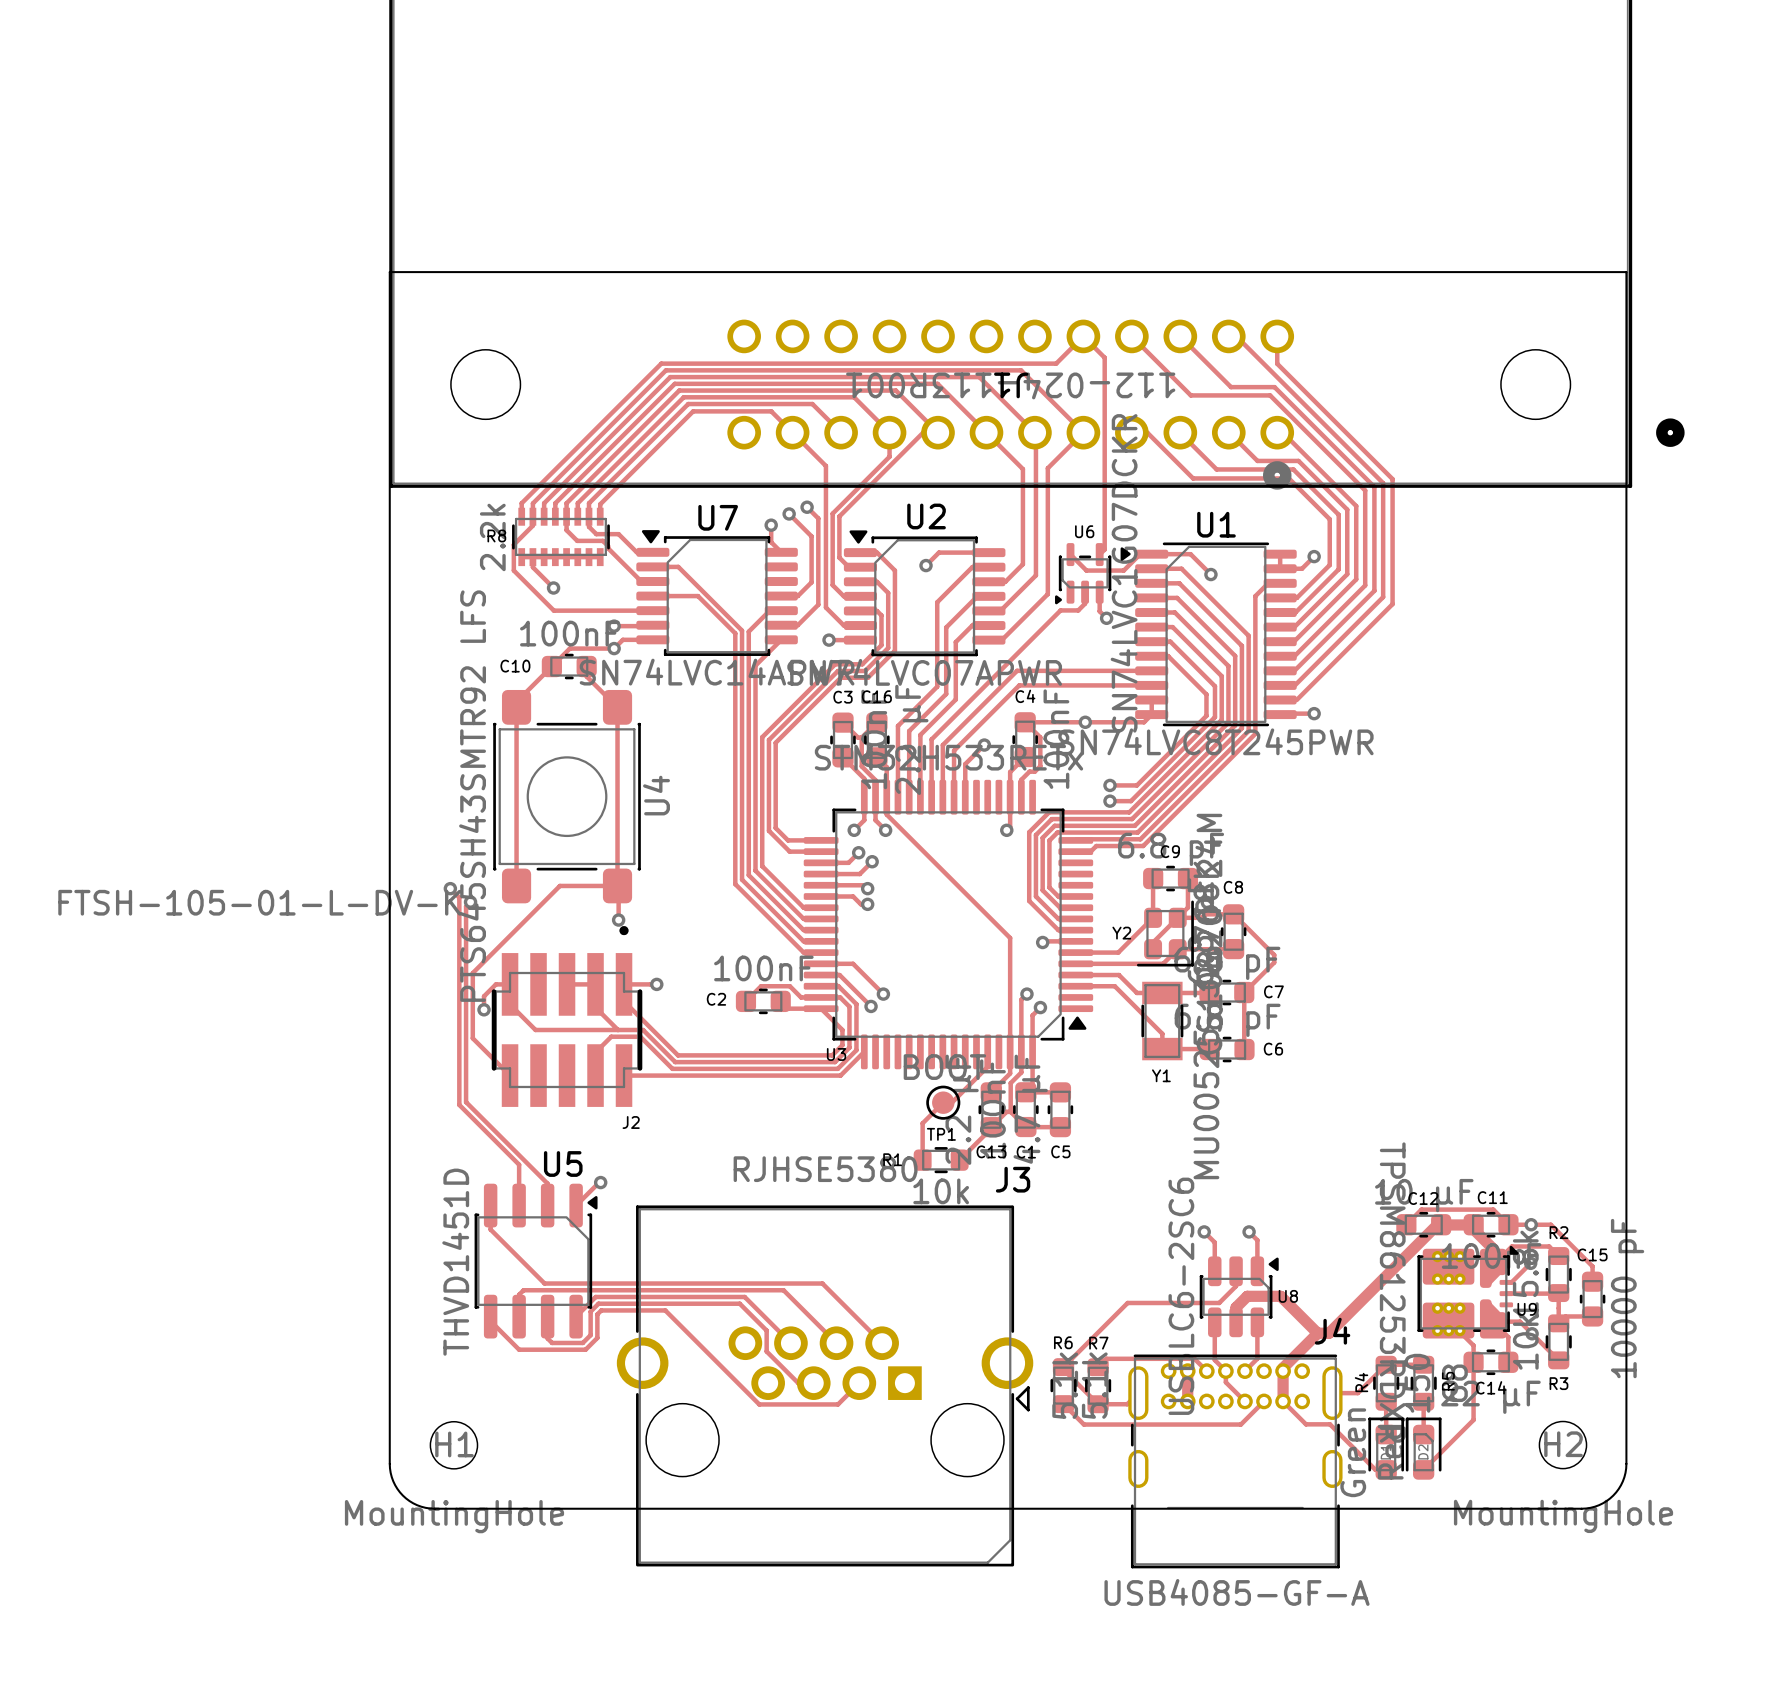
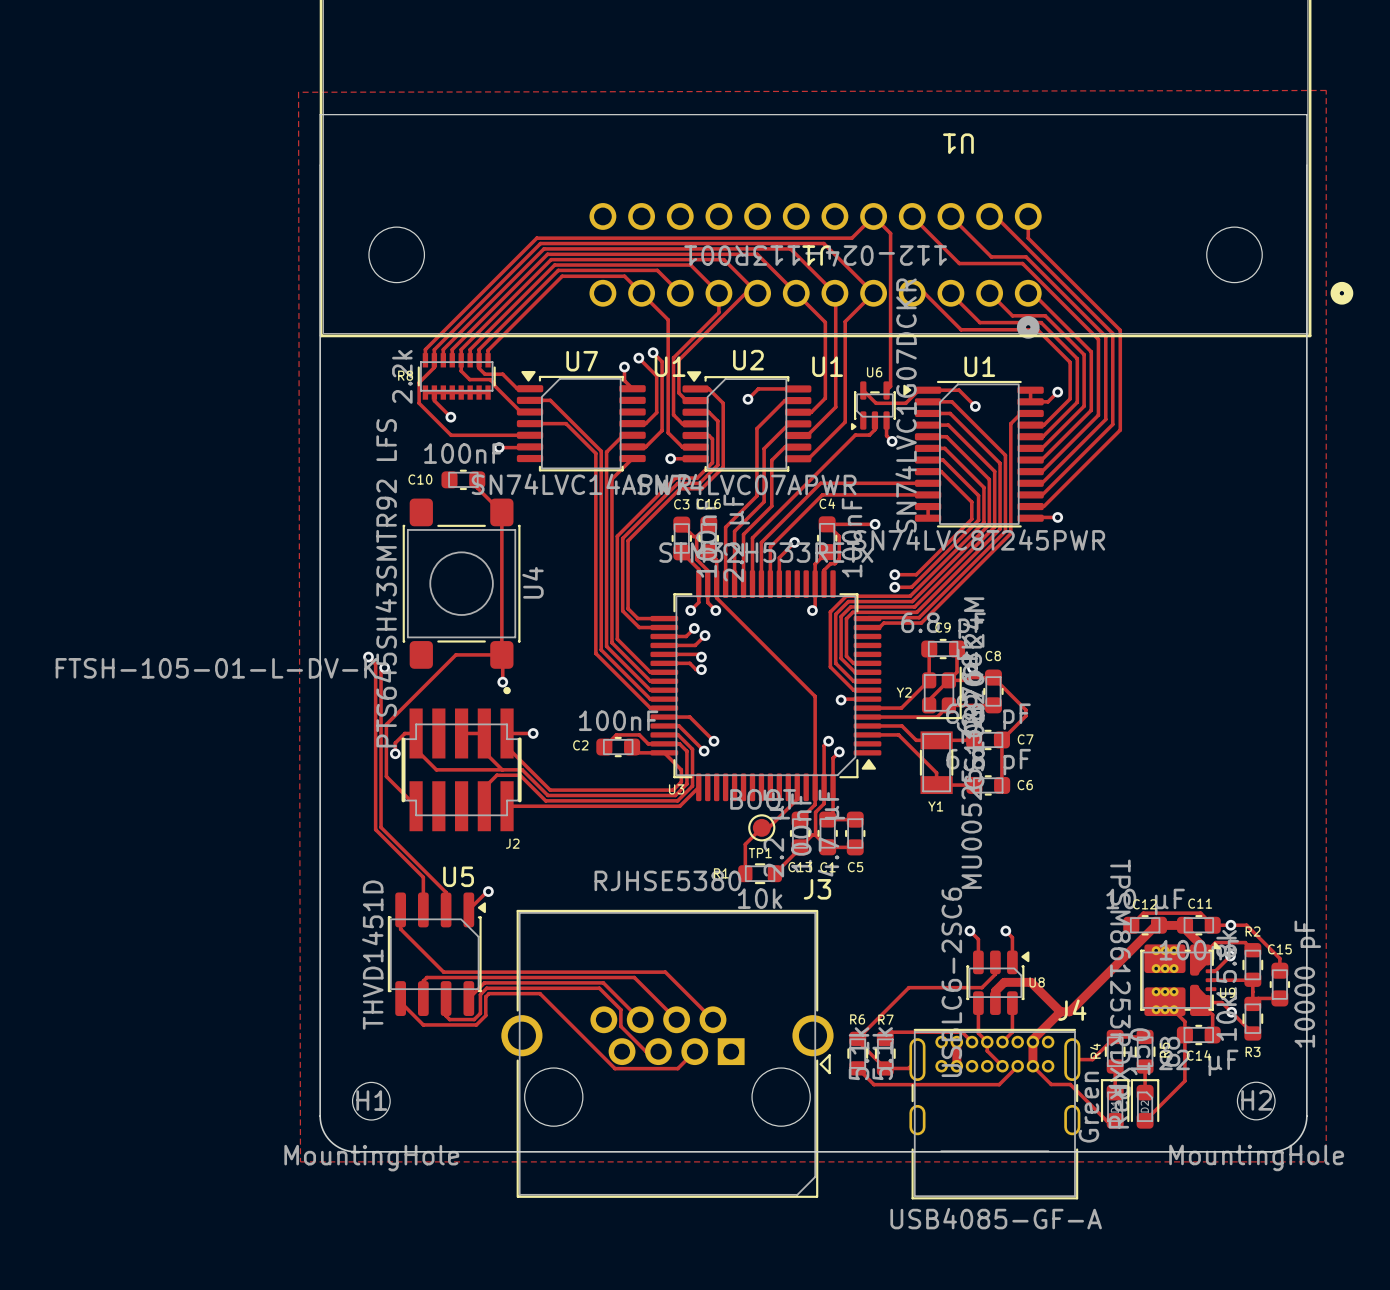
zone outline: none -> (1326, 90) (1326, 1160) (1324, 1160) (1326, 1161) (300, 1161) (298, 92) (1326, 90)
text: none -> U1 (958, 143)
board edge: (389, 272) (1626, 272) -> (320, 165) (320, 114) (1306, 114) (1306, 165)
text: none -> U1 (670, 366)
text: none -> U1 (827, 366)
track: (652, 639) (622, 639) (614, 648) (569, 648) (516, 701) (516, 885) (510, 892) -> none
via: (614, 648) -> none
track: (1151, 714) (1144, 722) (1085, 722) -> none

